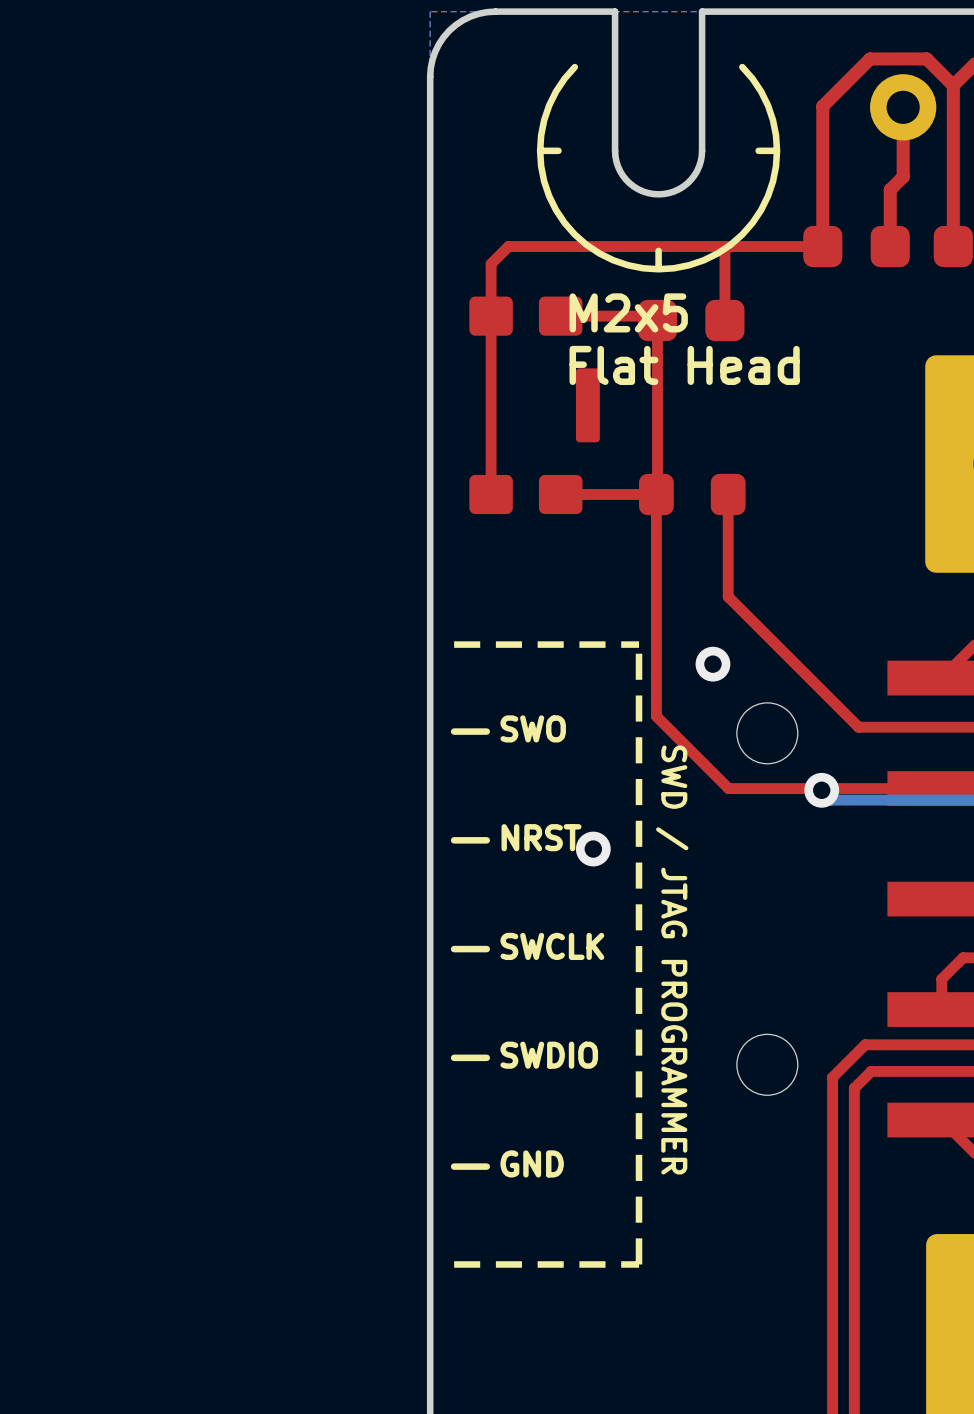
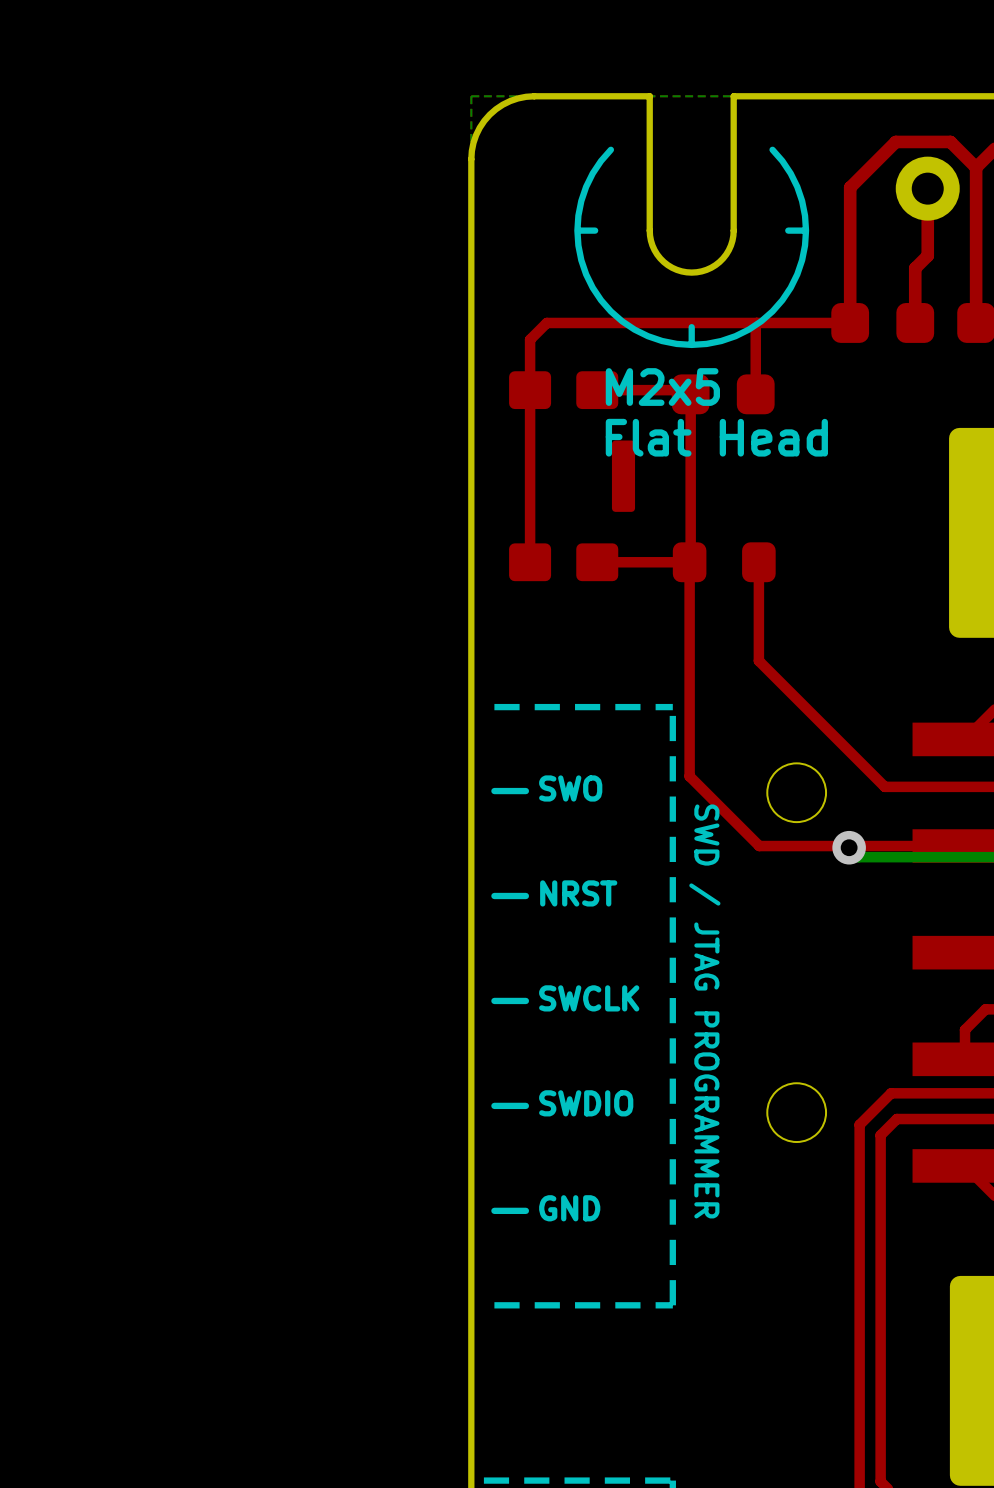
via: (712, 664) -> none
via: (593, 849) -> none

